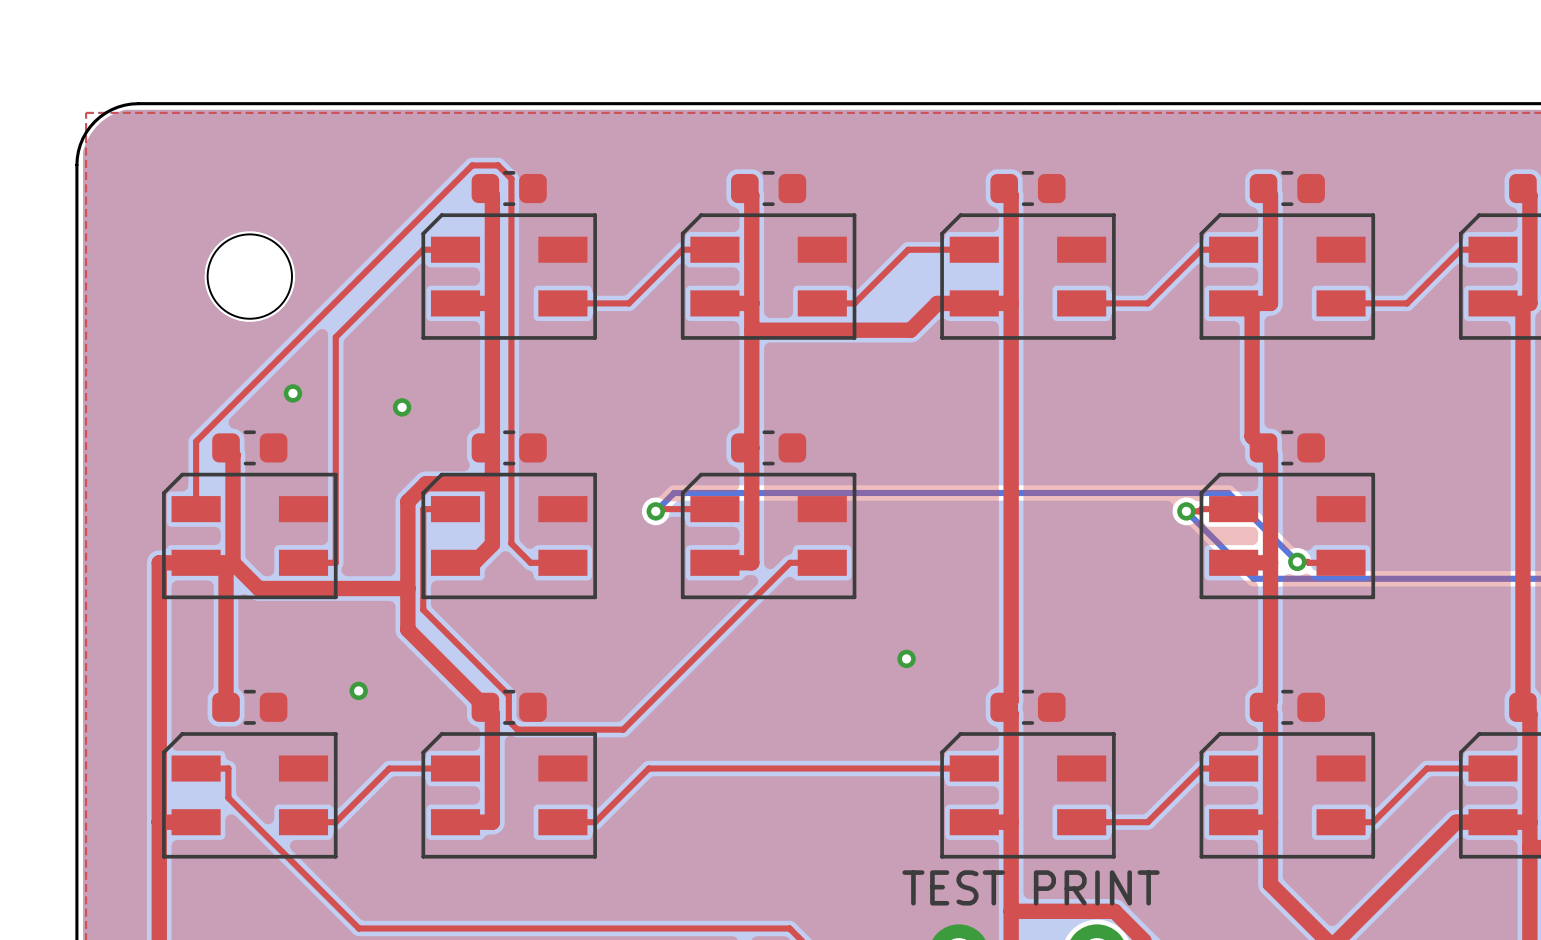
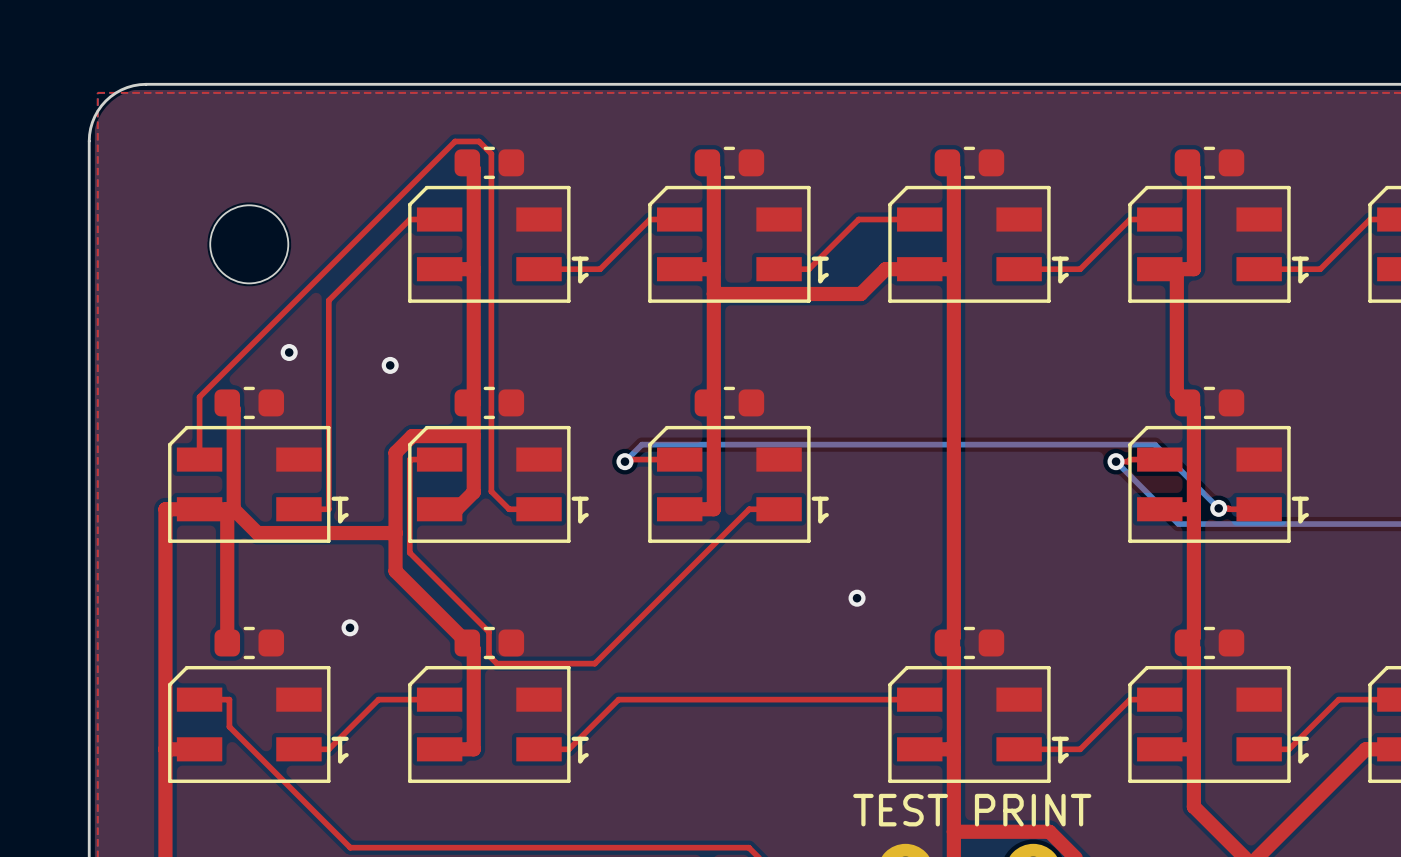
part text: none -> 1 (580, 270)
part text: none -> 1 (820, 270)
part text: none -> 1 (1060, 270)
part text: none -> 1 (1300, 270)
part text: none -> 1 (340, 510)
part text: none -> 1 (580, 510)
part text: none -> 1 (820, 510)
part text: none -> 1 (1300, 510)
part text: none -> 1 (340, 750)
part text: none -> 1 (580, 750)
part text: none -> 1 (1060, 750)
part text: none -> 1 (1300, 750)

